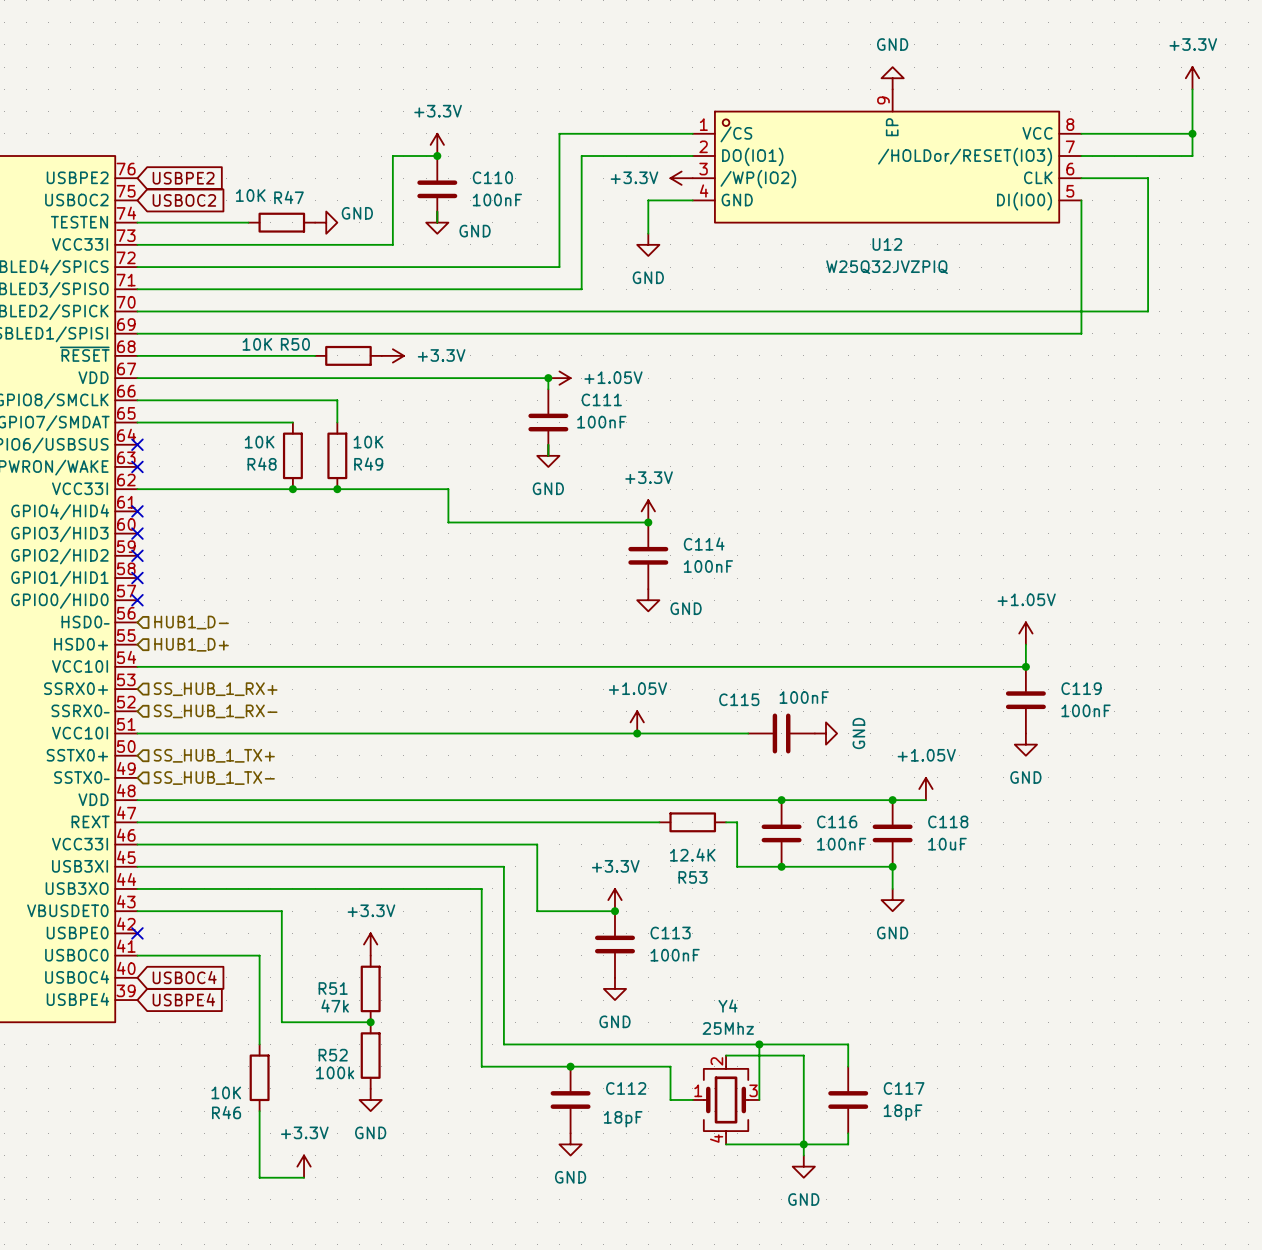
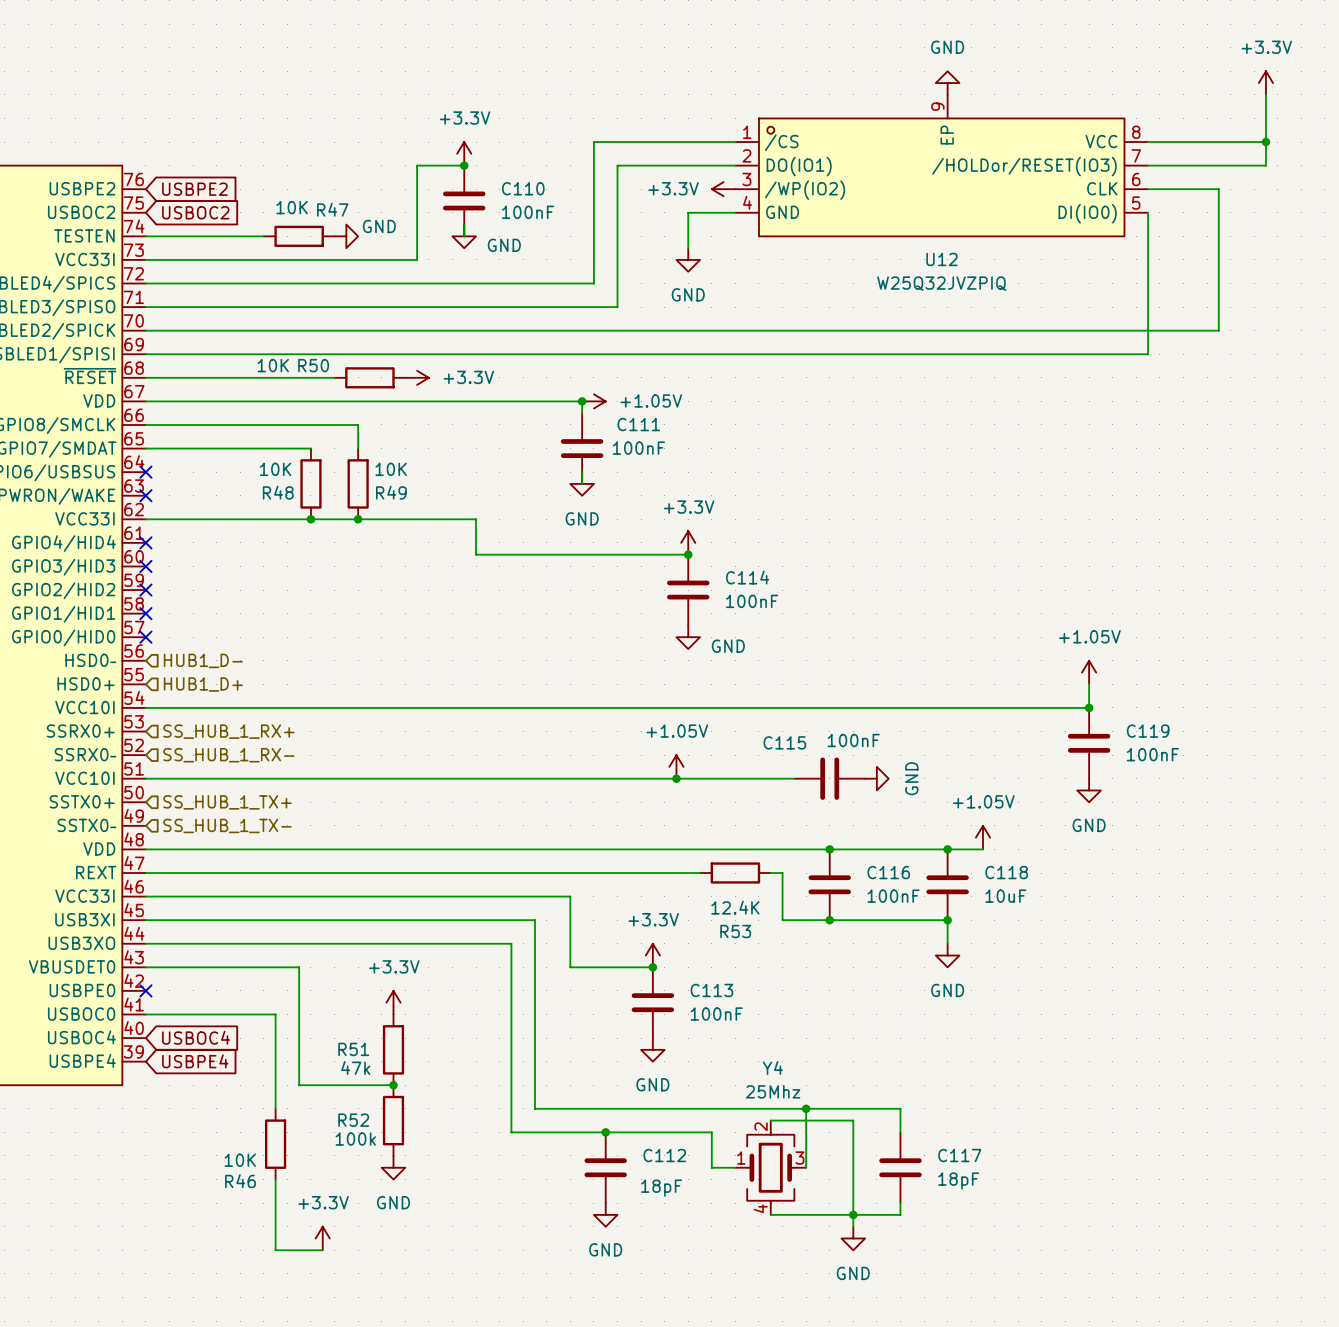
R47 value position: 10K (250, 195) -> 10K (292, 207)
R47 name position: R47 (289, 197) -> R47 (332, 209)

